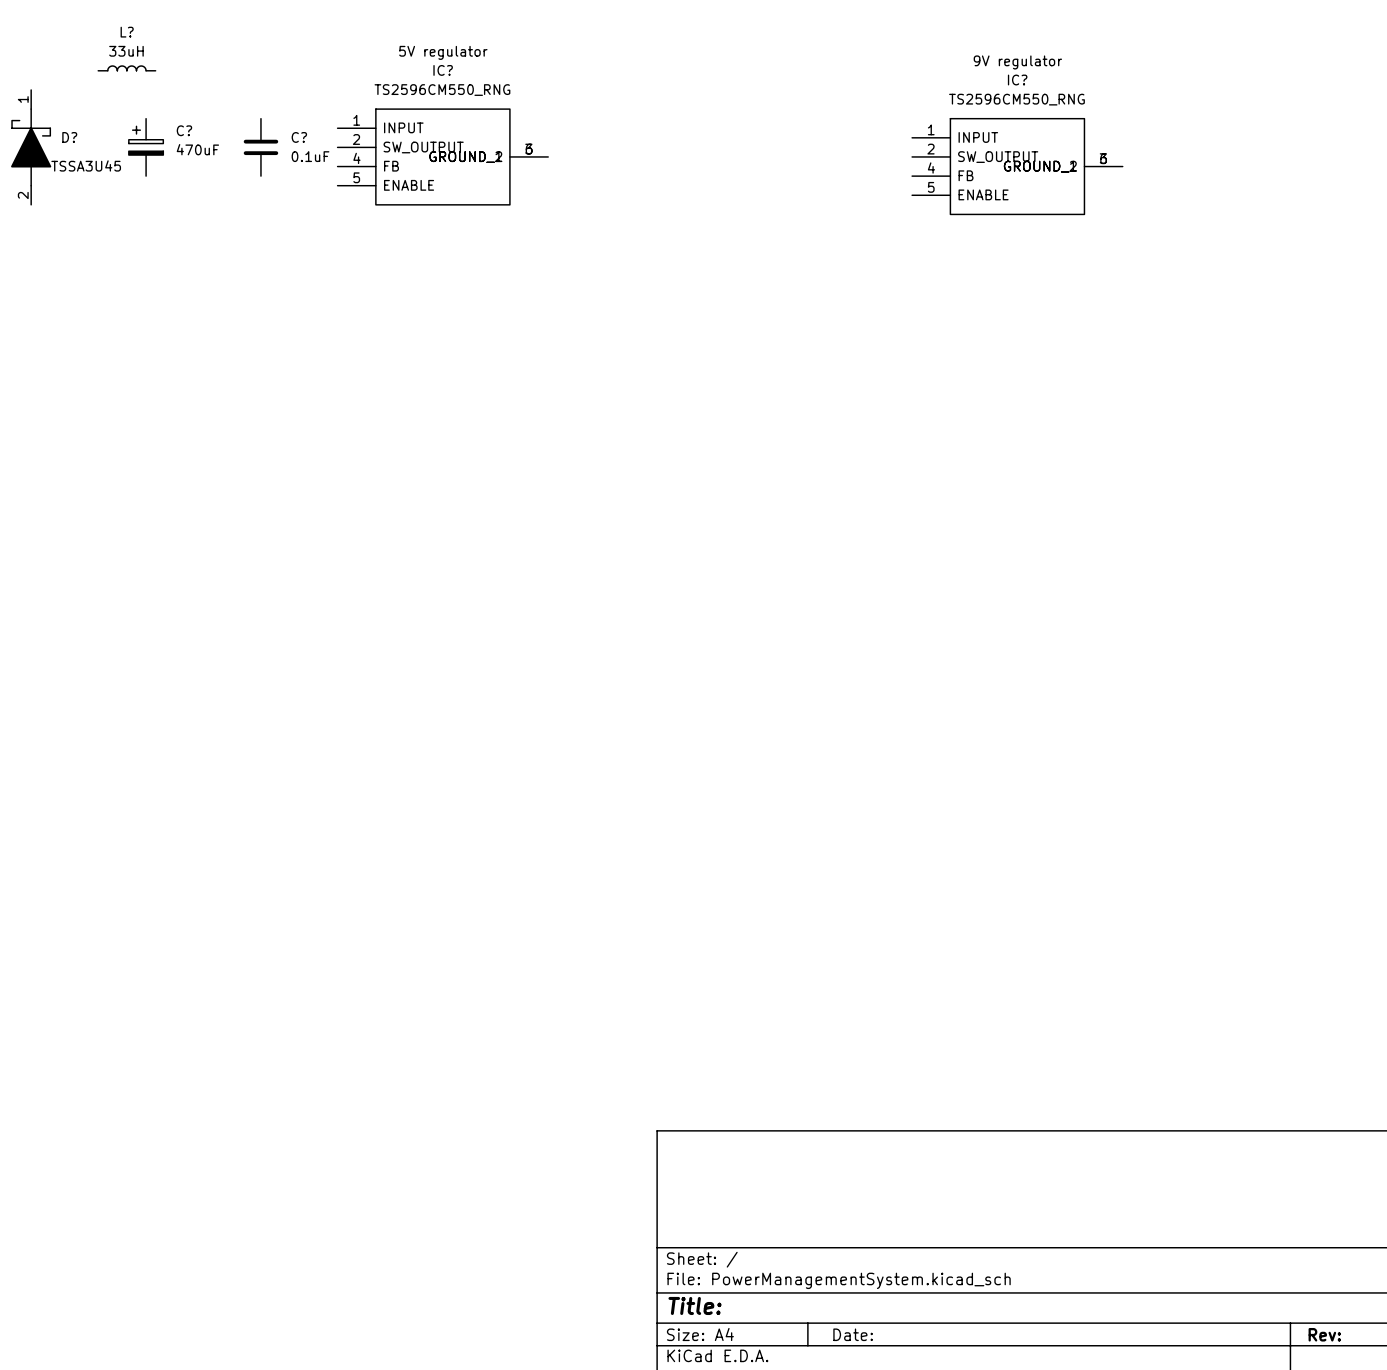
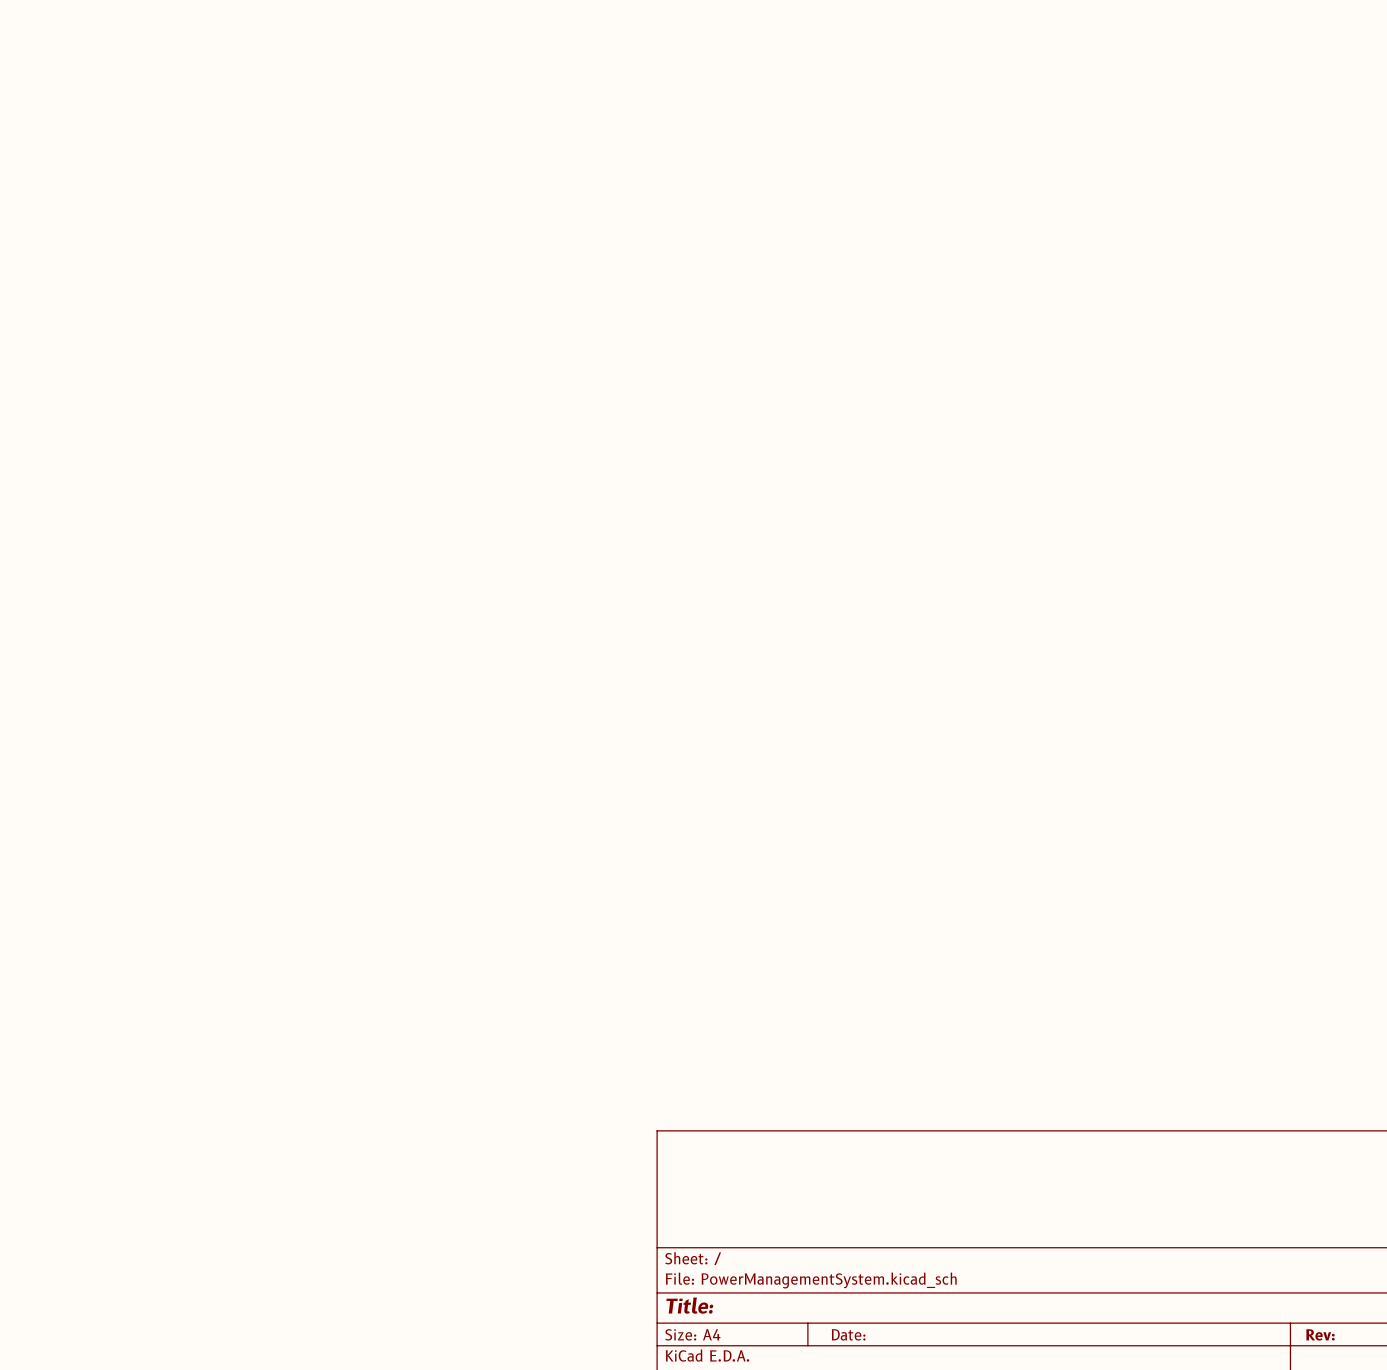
L?: 33uH (126, 68) -> none
D?: TSSA3U45 (31, 147) -> none
C?: 470uF (146, 147) -> none
C?: 0.1uF (260, 147) -> none
IC?: TS2596CM550_RNG (442, 156) -> none
IC?: TS2596CM550_RNG (1017, 166) -> none

